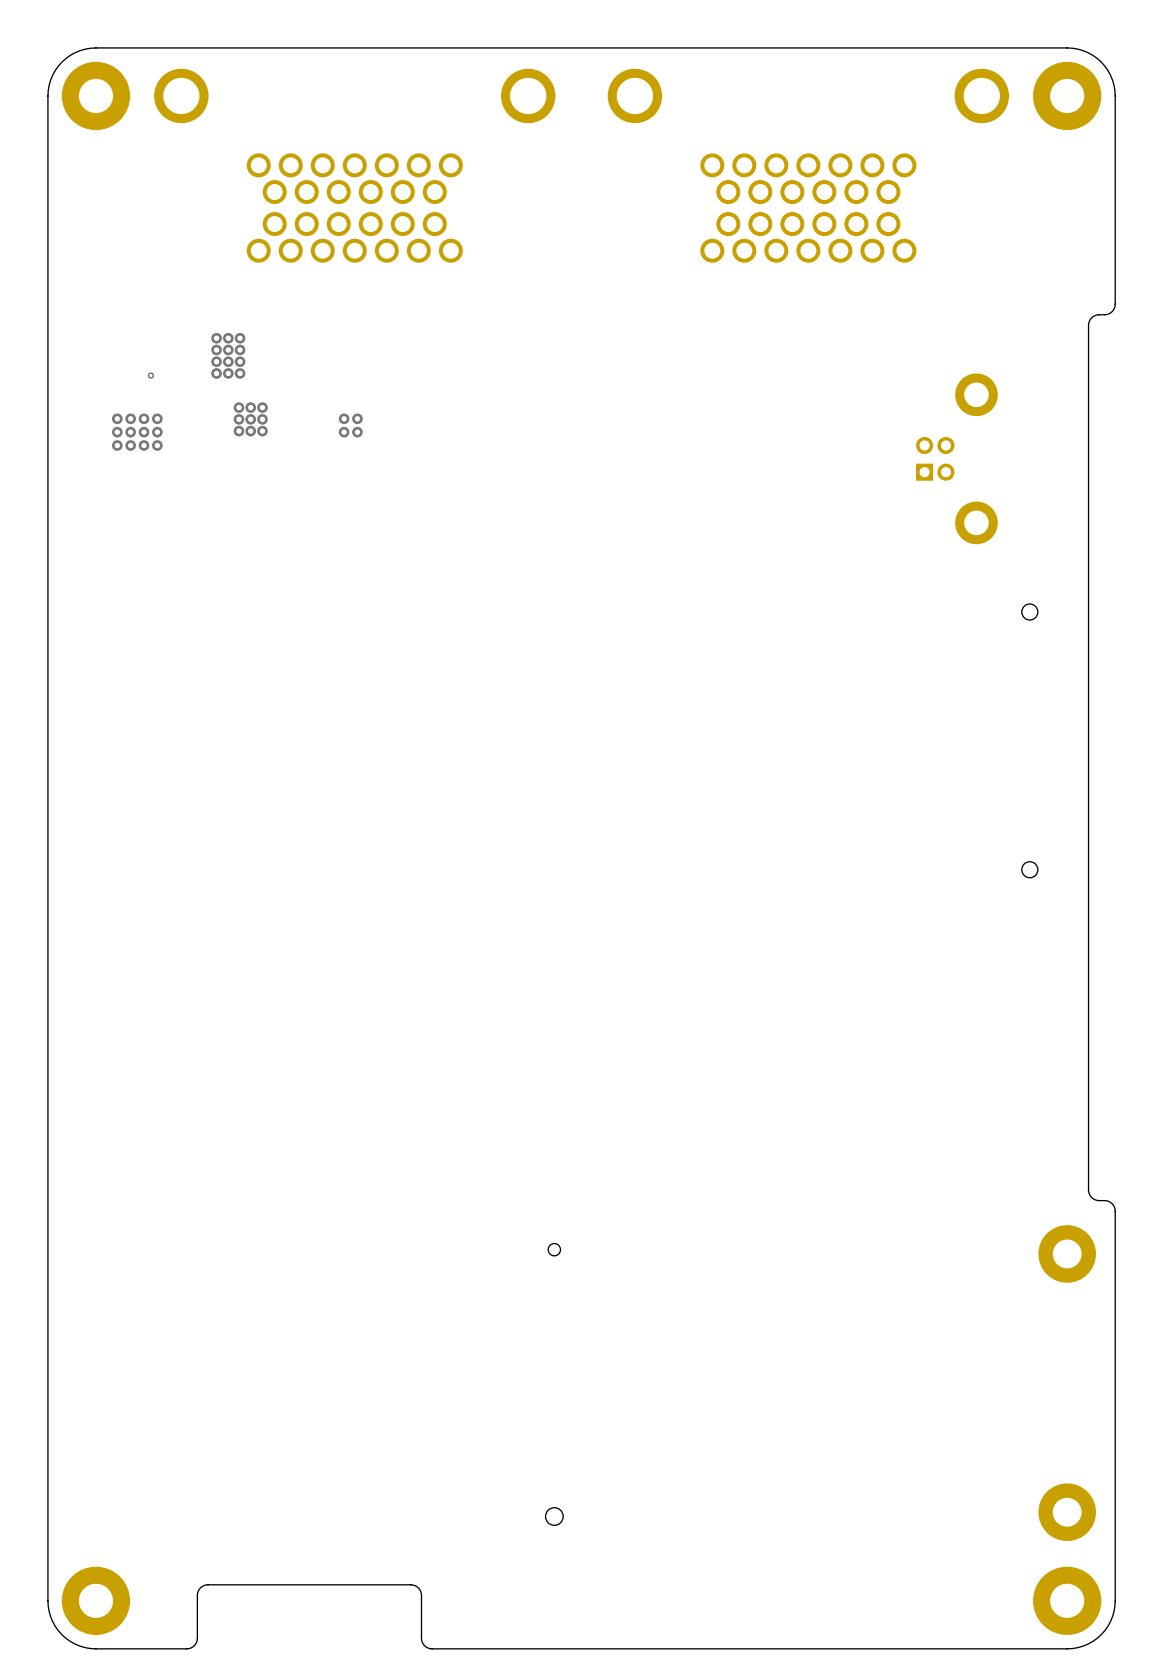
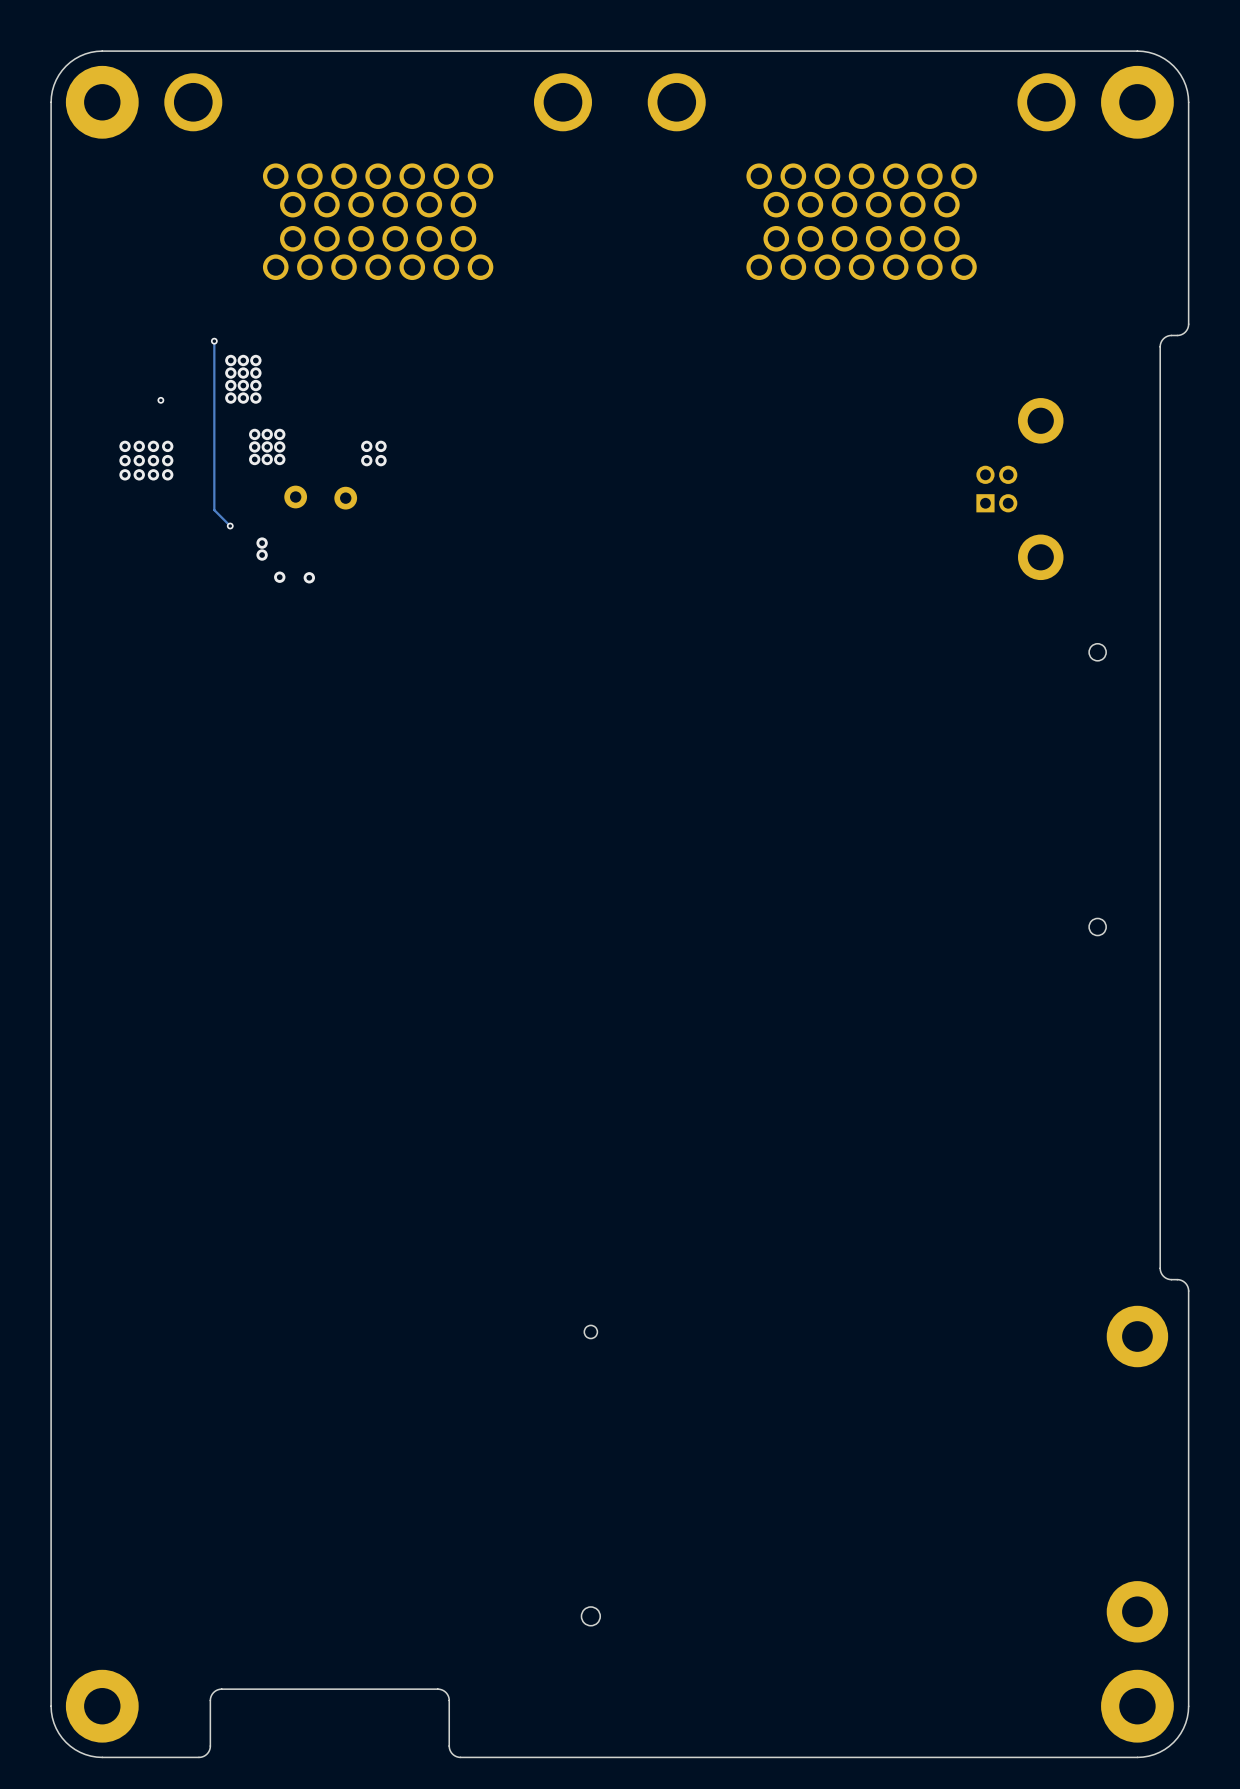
track: none -> (214, 341) (214, 510) (230, 526)
via: none -> (214, 341)
part: none -> (295, 497)
part: none -> (345, 498)
via: none -> (230, 526)
via: none -> (262, 543)
via: none -> (262, 555)
via: none -> (279, 577)
via: none -> (309, 577)

